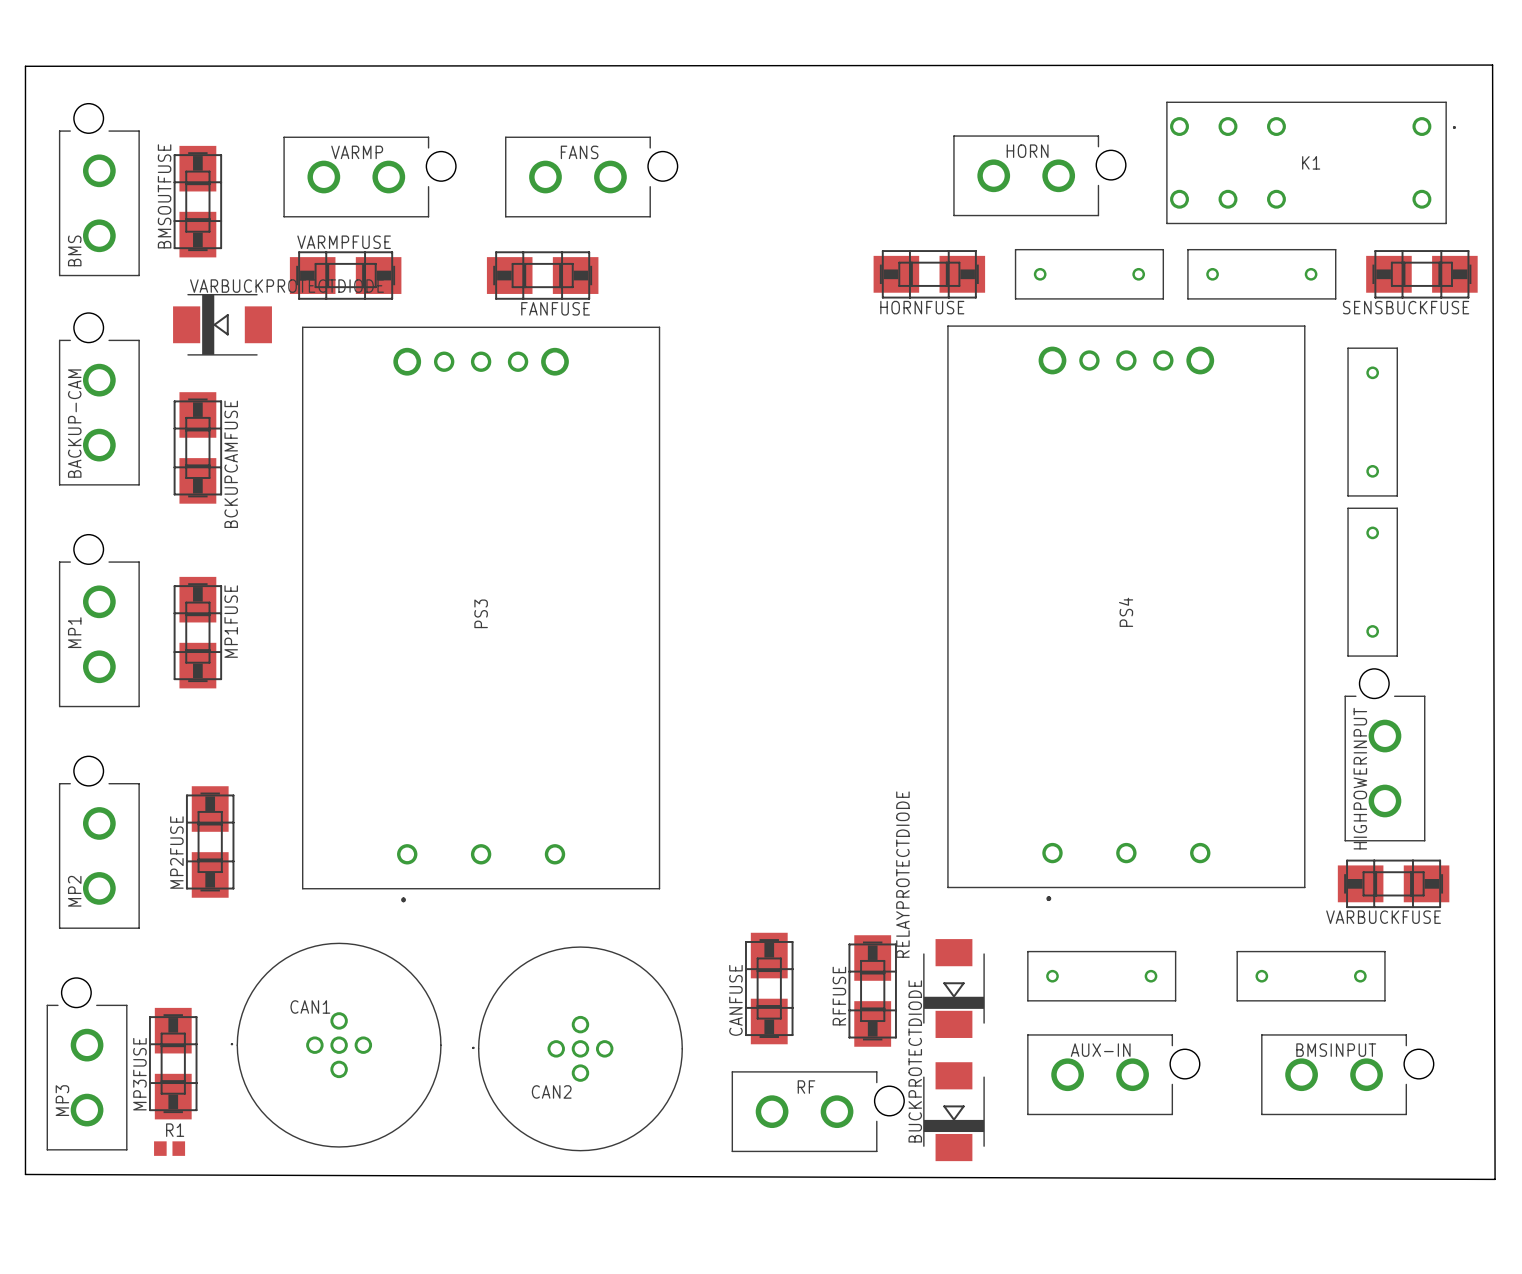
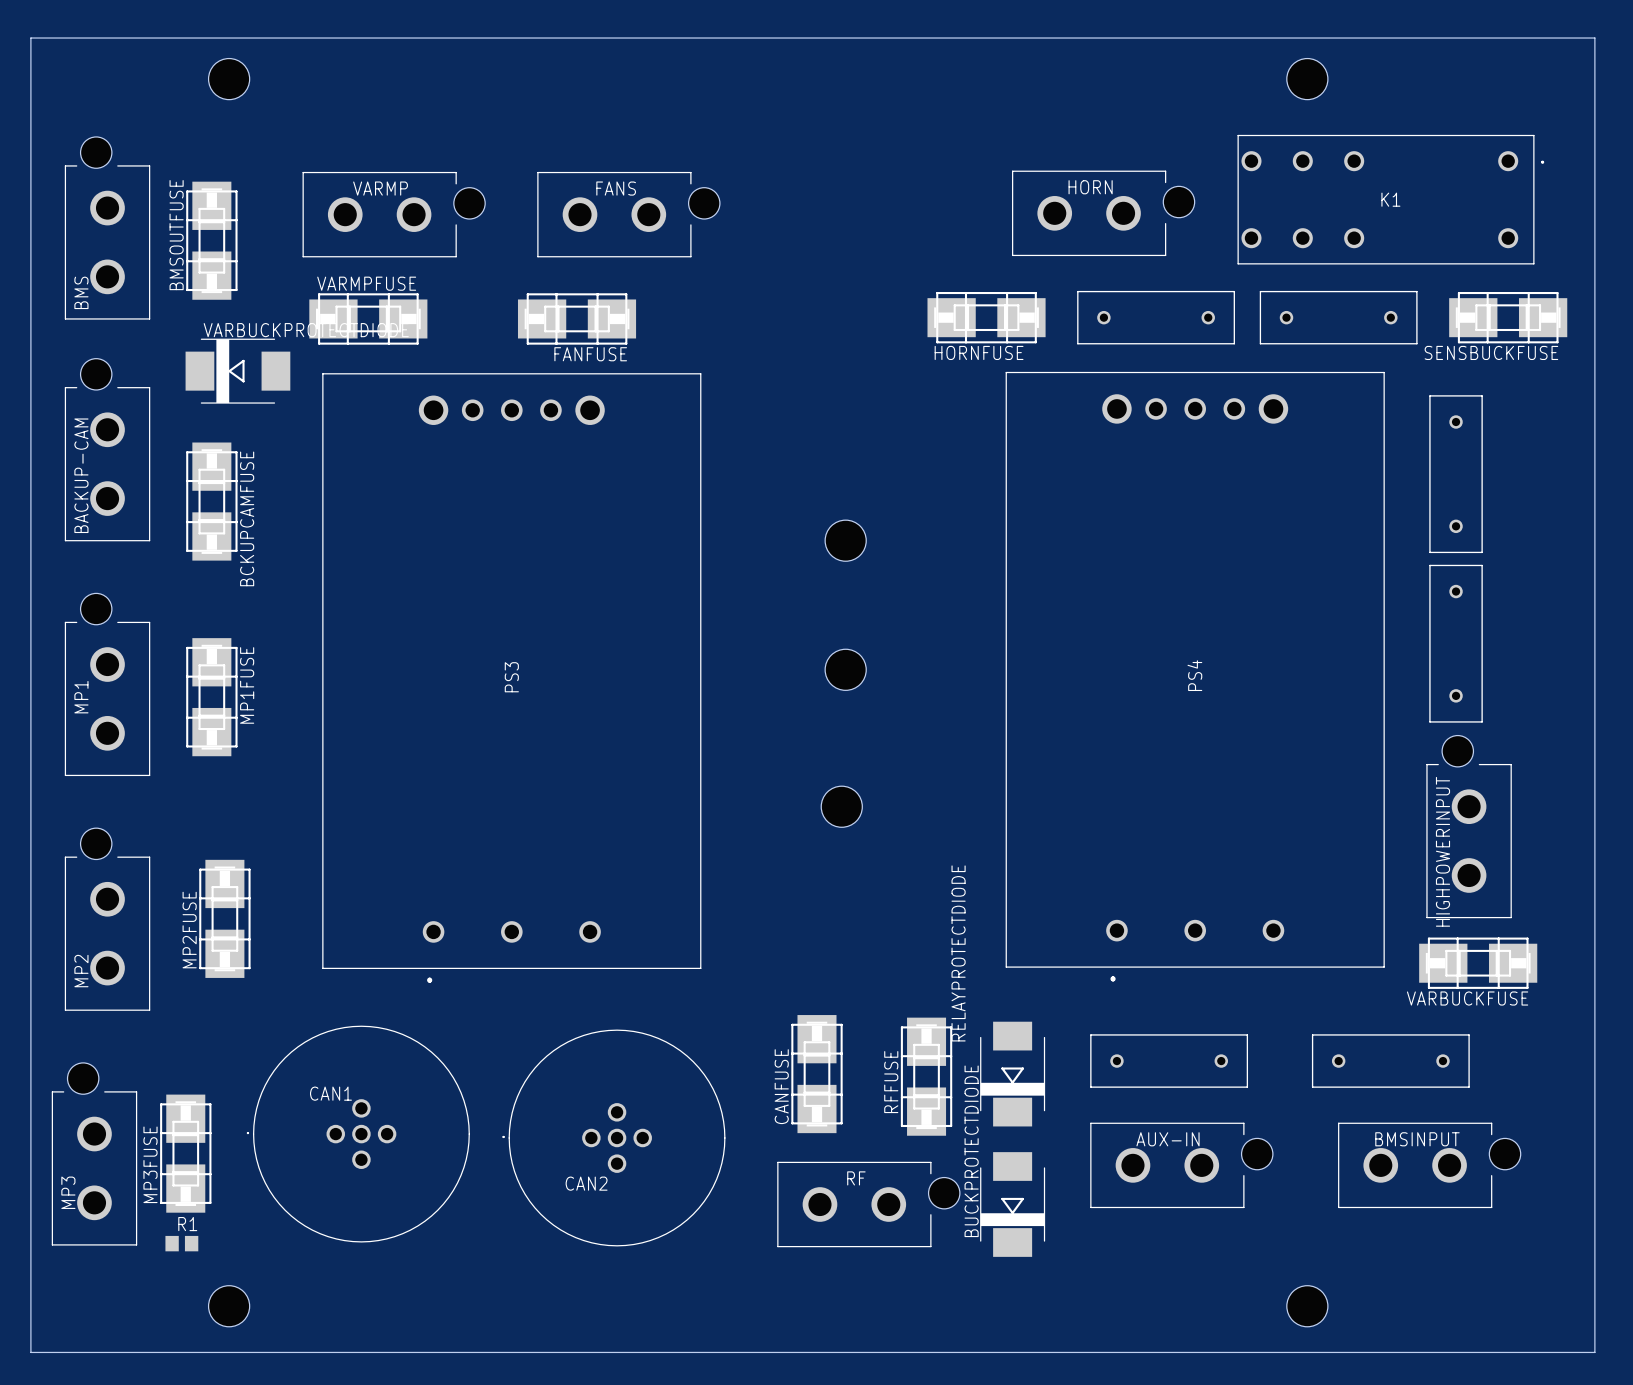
hole: none -> (229, 79)
hole: none -> (1307, 79)
board edge: (1492, 65) (1495, 1179) (25, 1174) (25, 66) (1492, 65) -> (30, 38) (30, 1352) (1594, 1352) (1594, 38) (30, 38)
hole: none -> (845, 540)
hole: none -> (845, 669)
hole: none -> (841, 806)
hole: none -> (229, 1306)
hole: none -> (1307, 1306)

